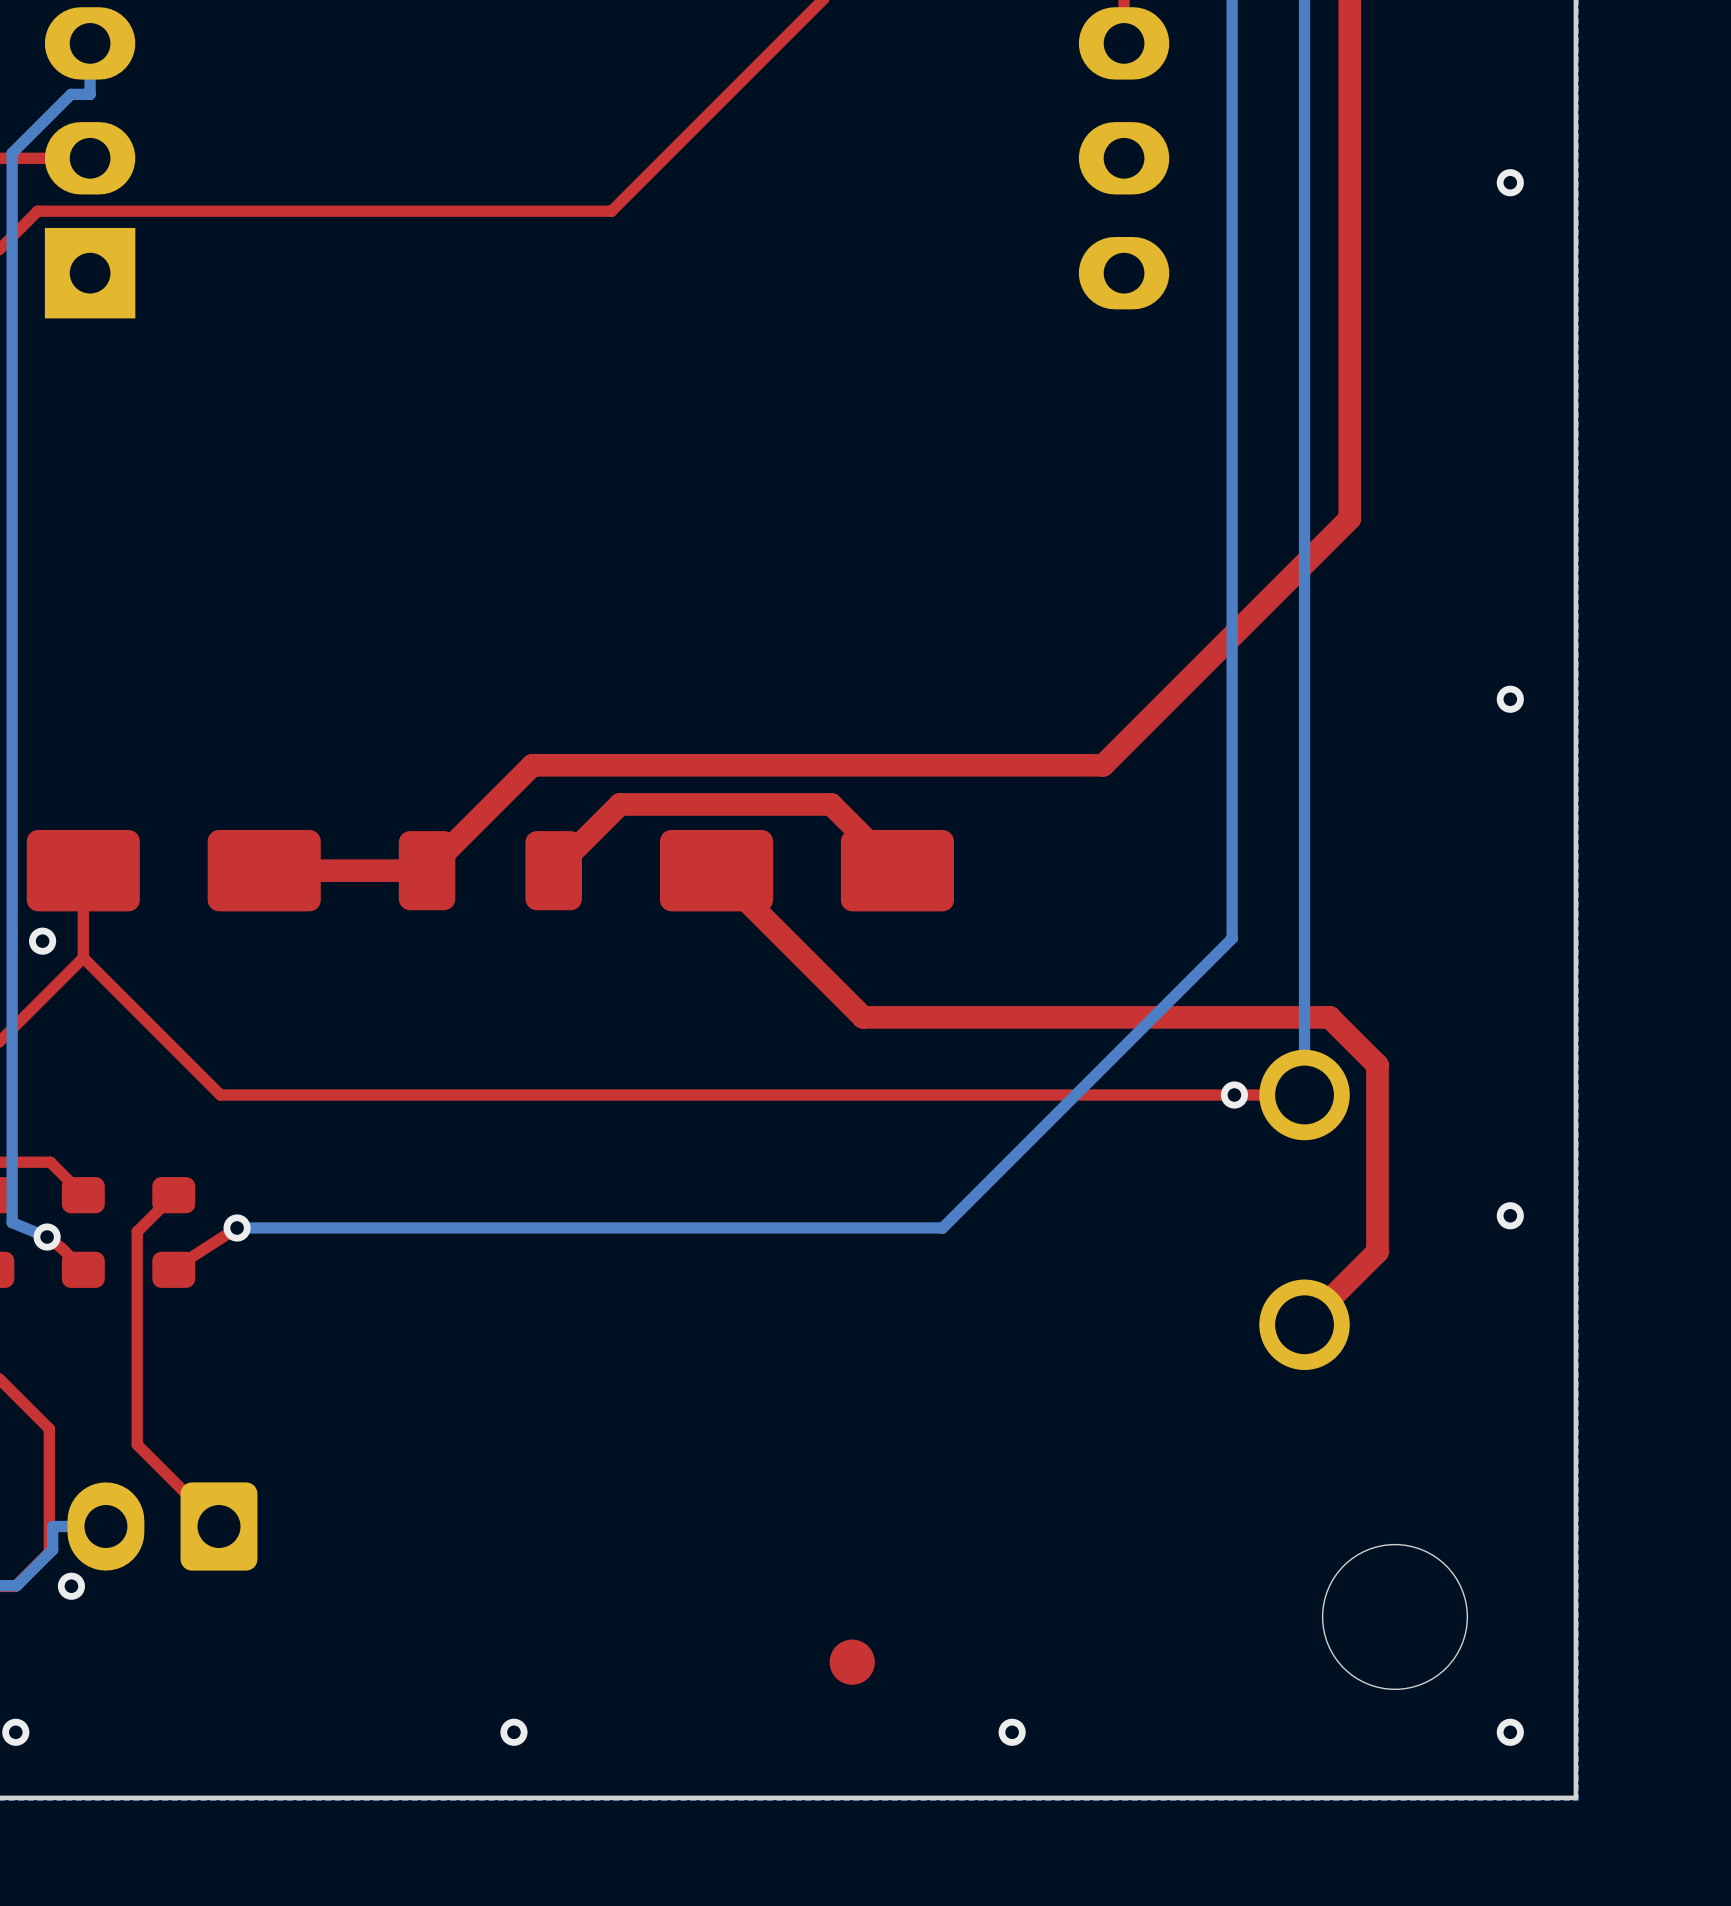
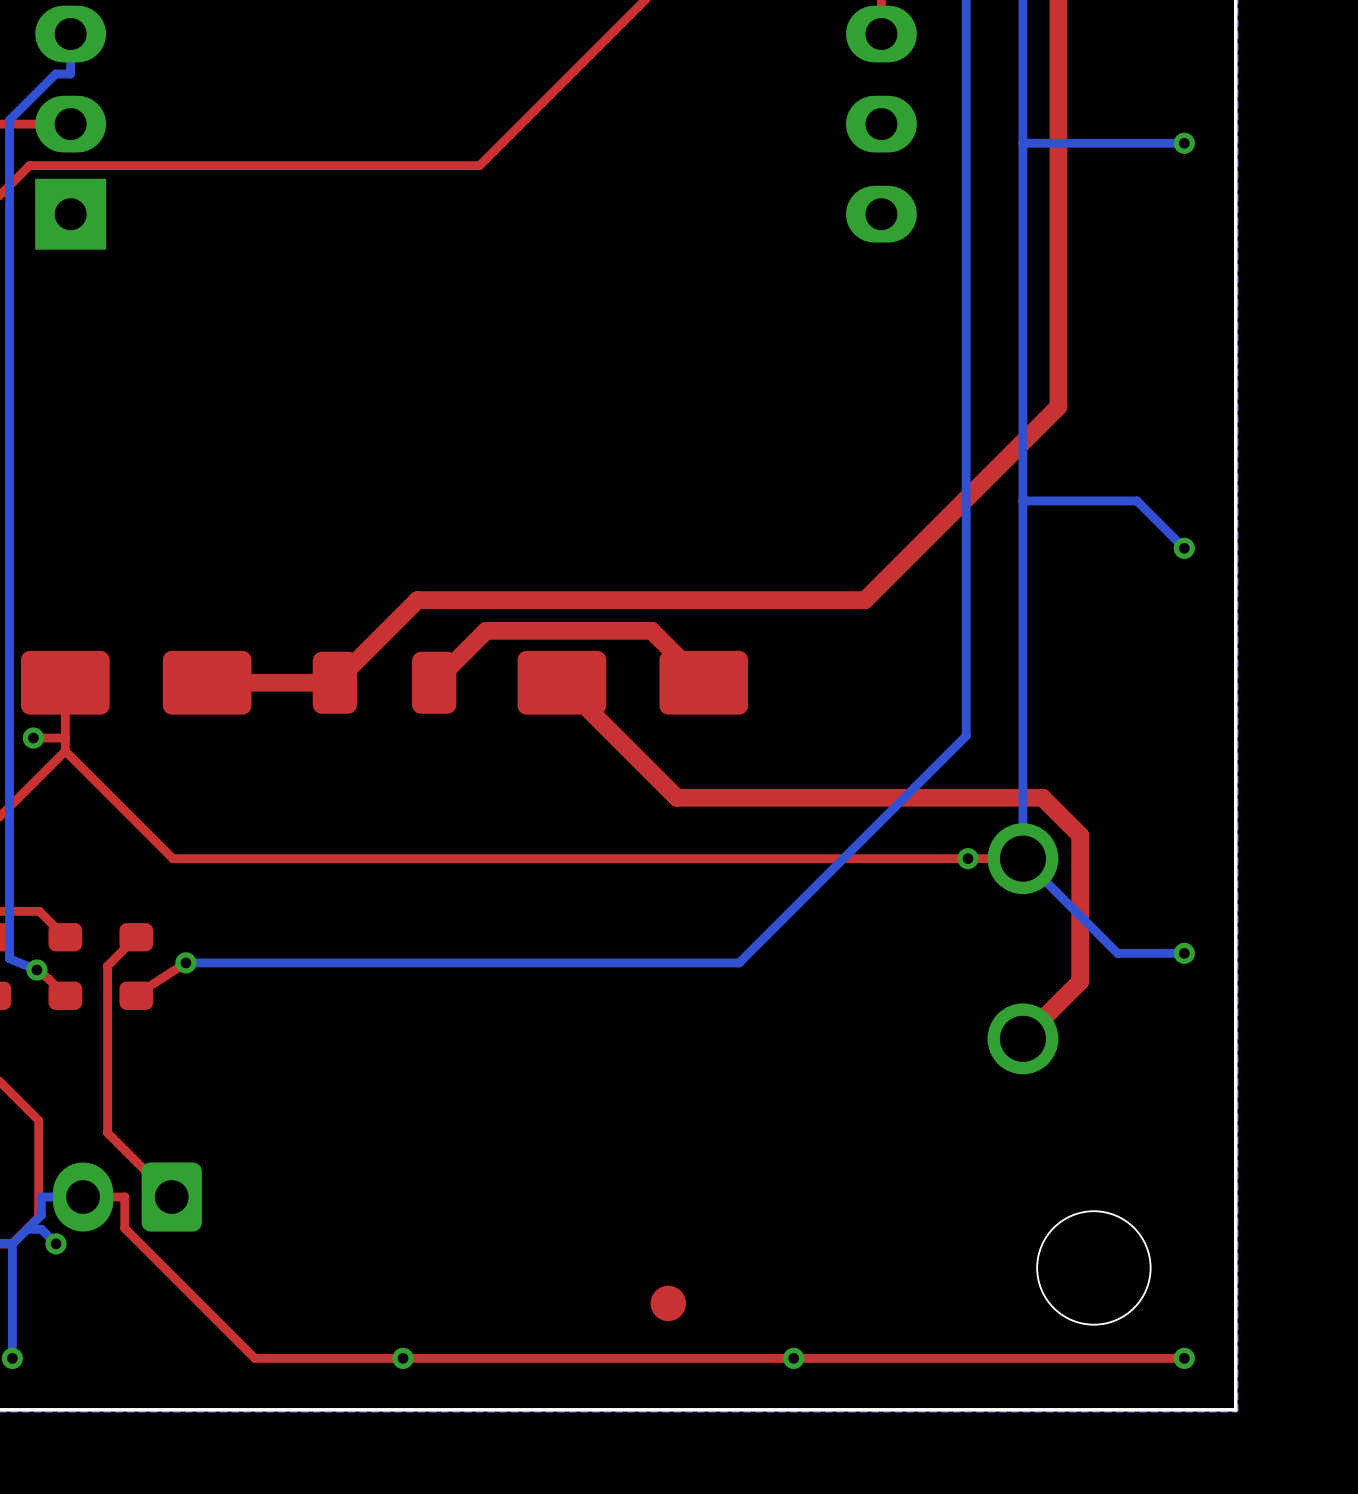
bottom track: none -> (1184, 143) (1022, 143)
bottom track: none -> (1022, 500) (1136, 500) (1184, 548)
top track: none -> (65, 738) (33, 738)
bottom track: none -> (1022, 858) (1117, 953) (1184, 953)
top track: none -> (83, 1197) (124, 1197) (124, 1228) (254, 1358) (1184, 1358)
bottom track: none -> (27, 1229) (41, 1229) (56, 1243)
bottom track: none -> (12, 1243) (12, 1358)

